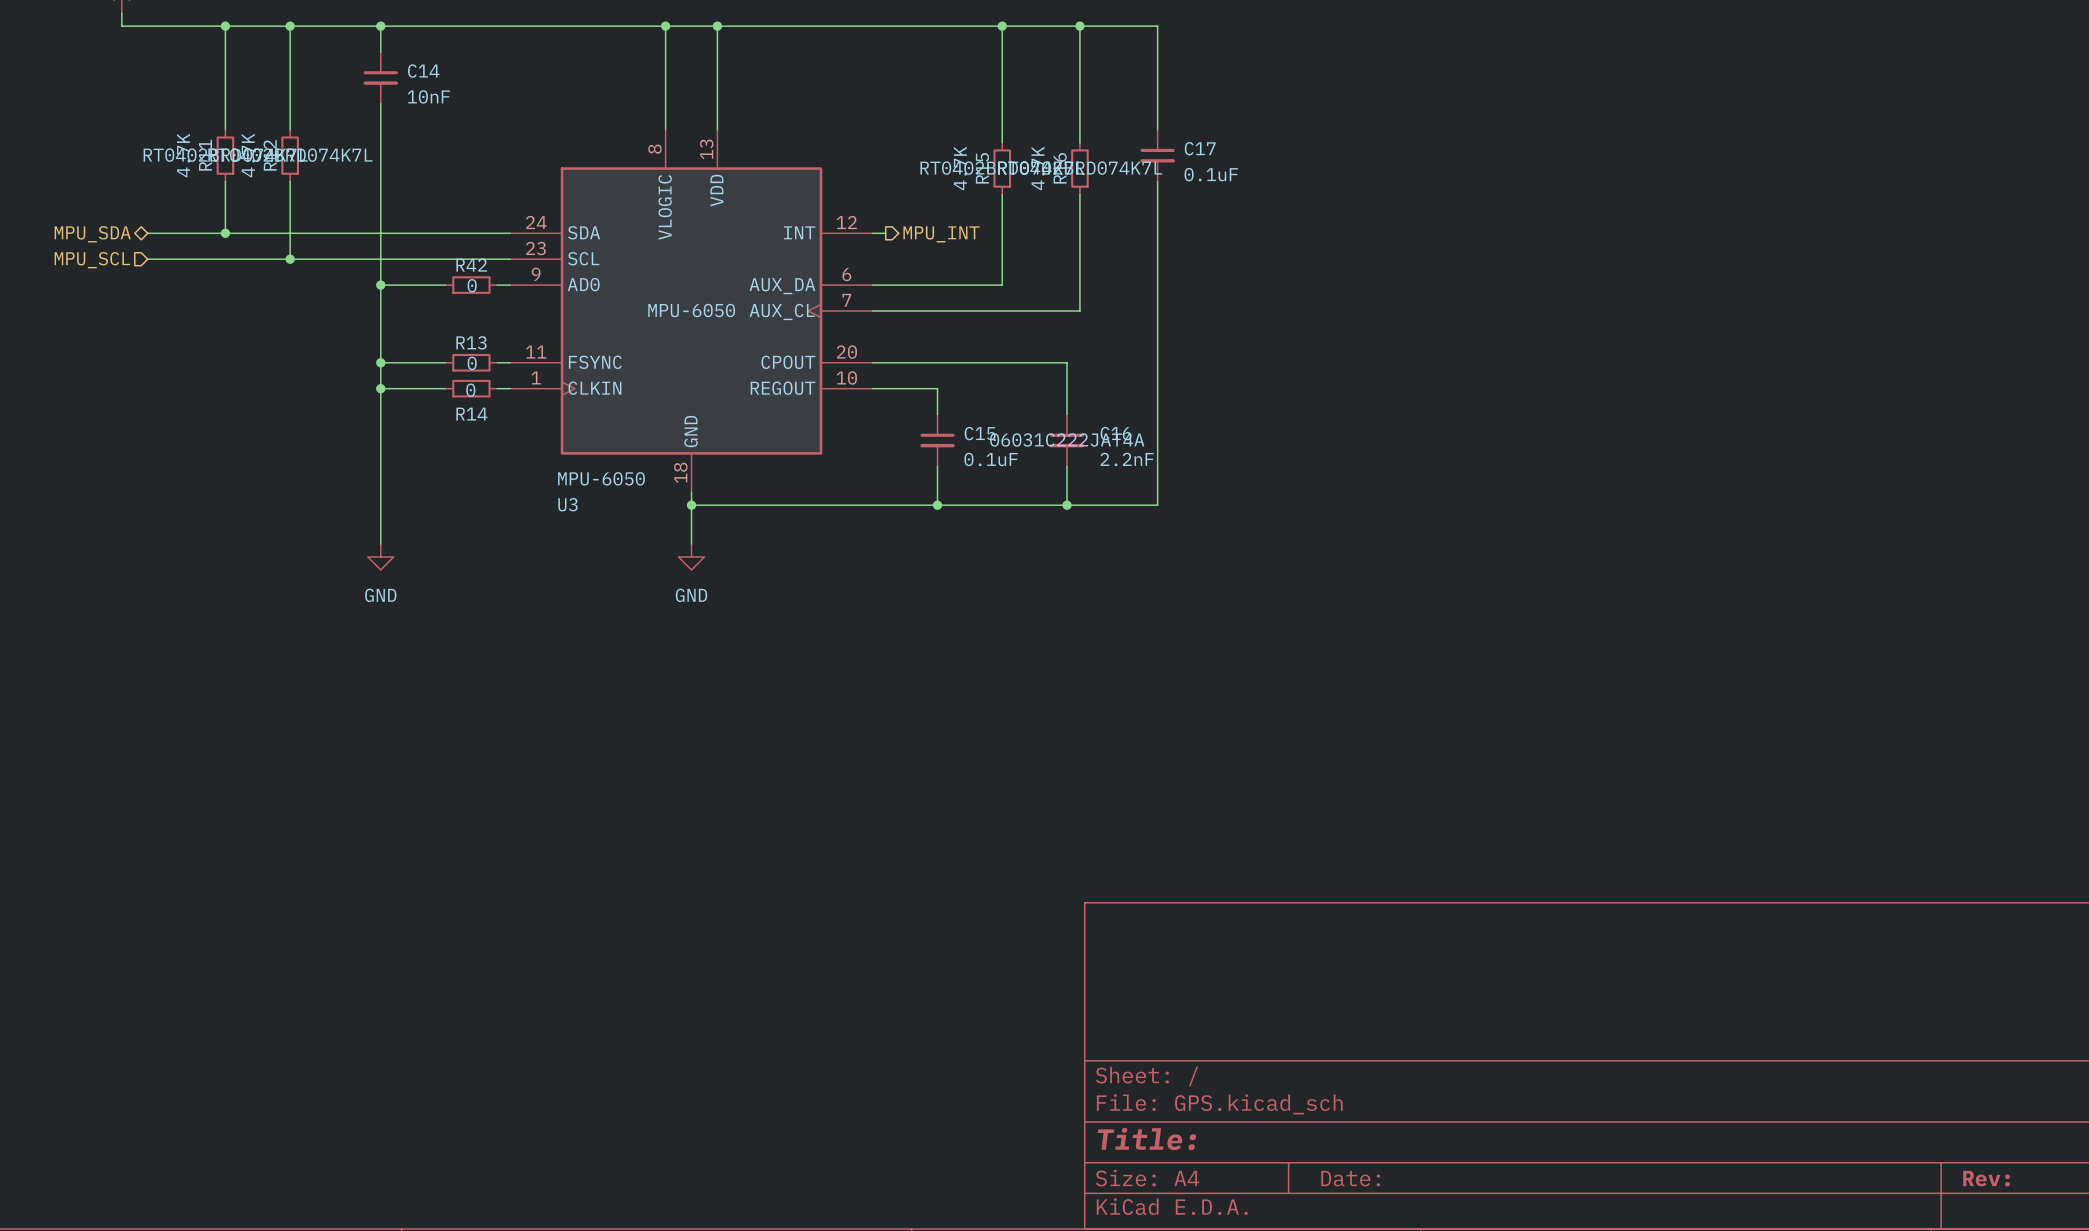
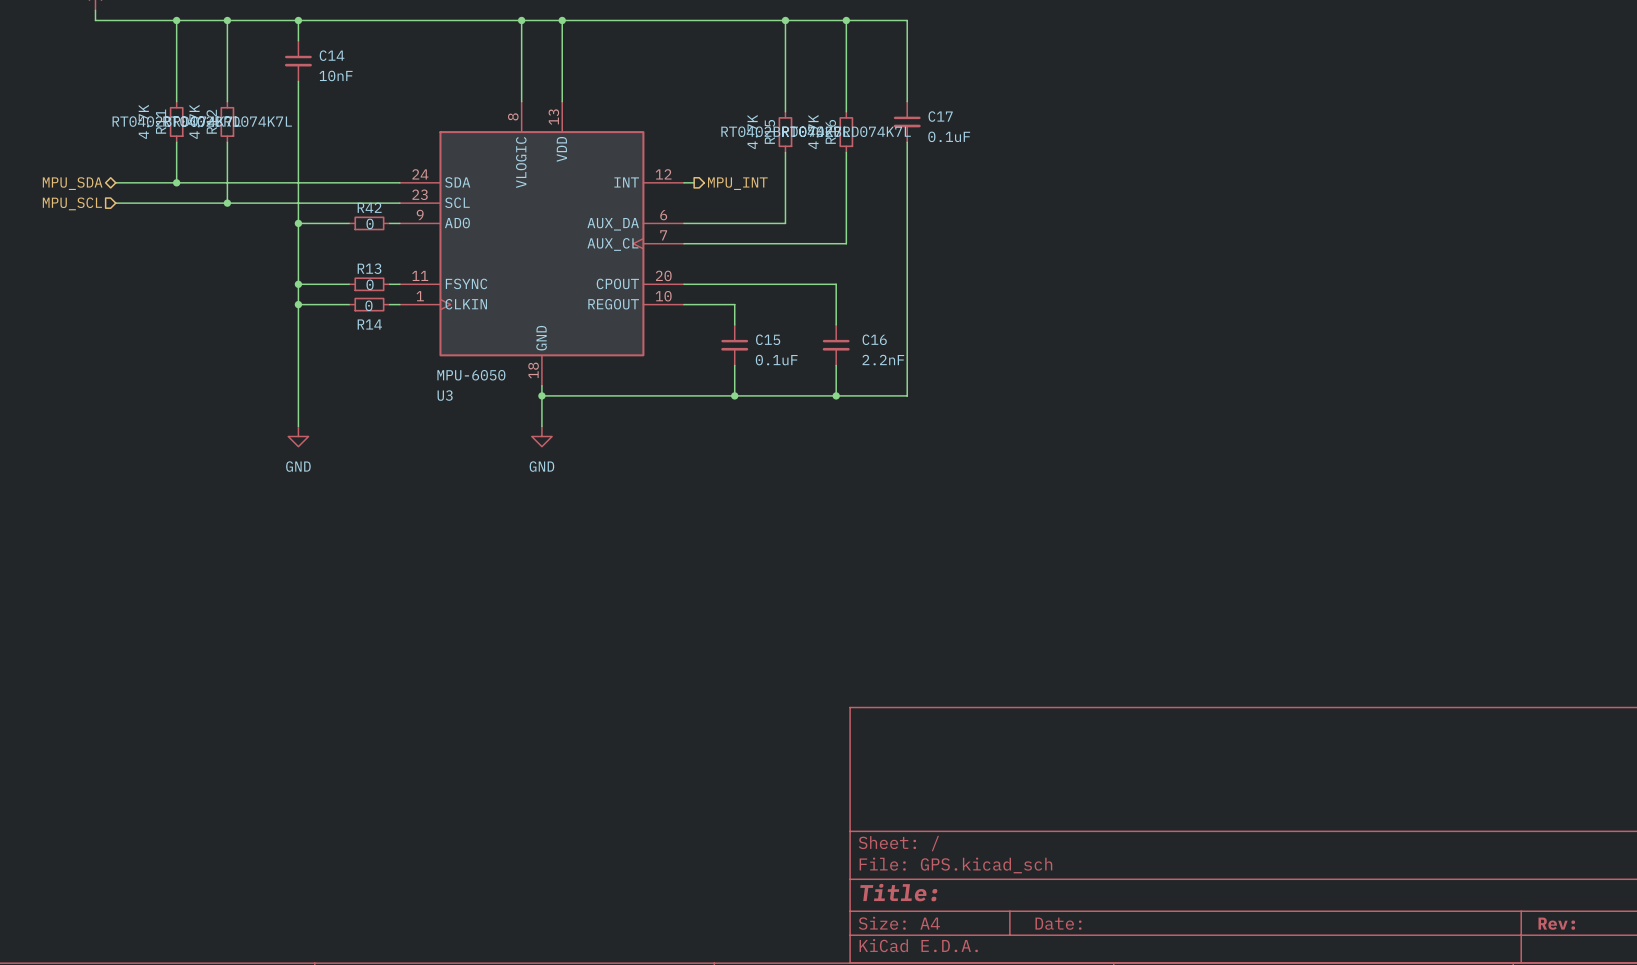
U3 text: MPU-6050 (691, 310) -> none
C16 text: 06031C222JAT4A (1067, 439) -> none

